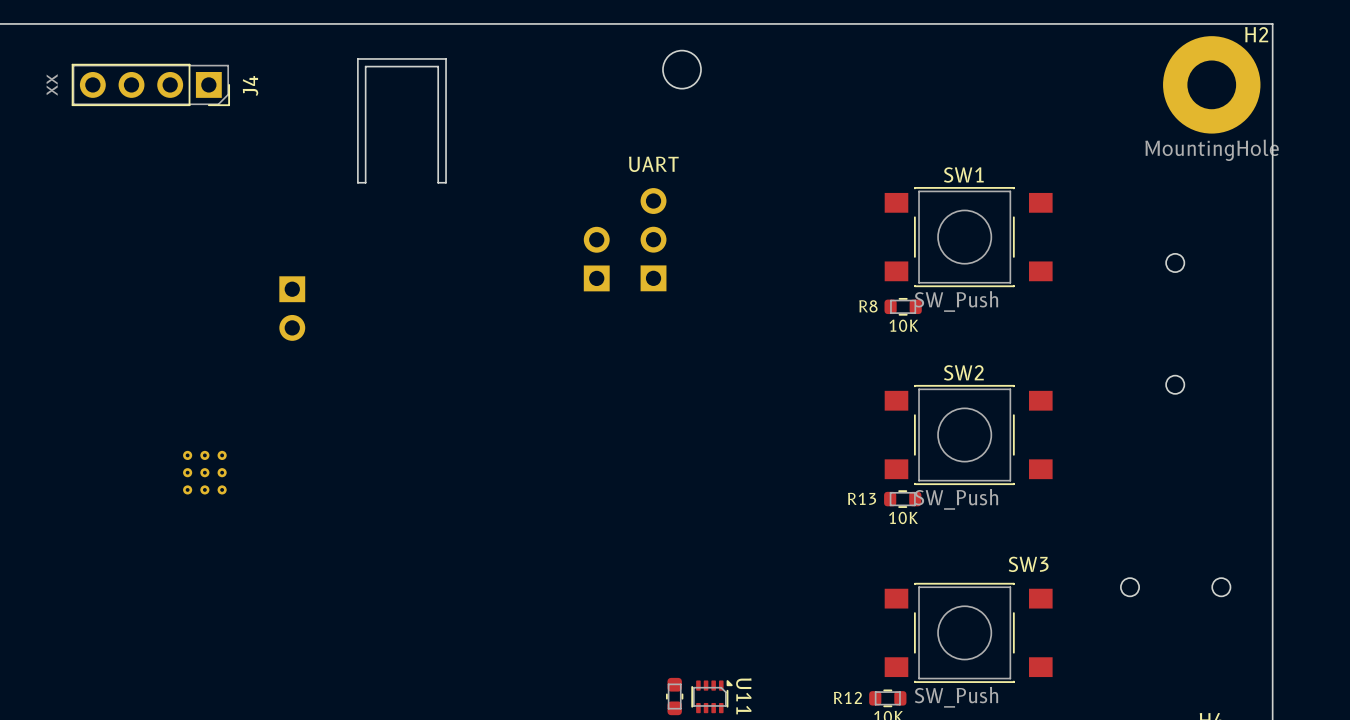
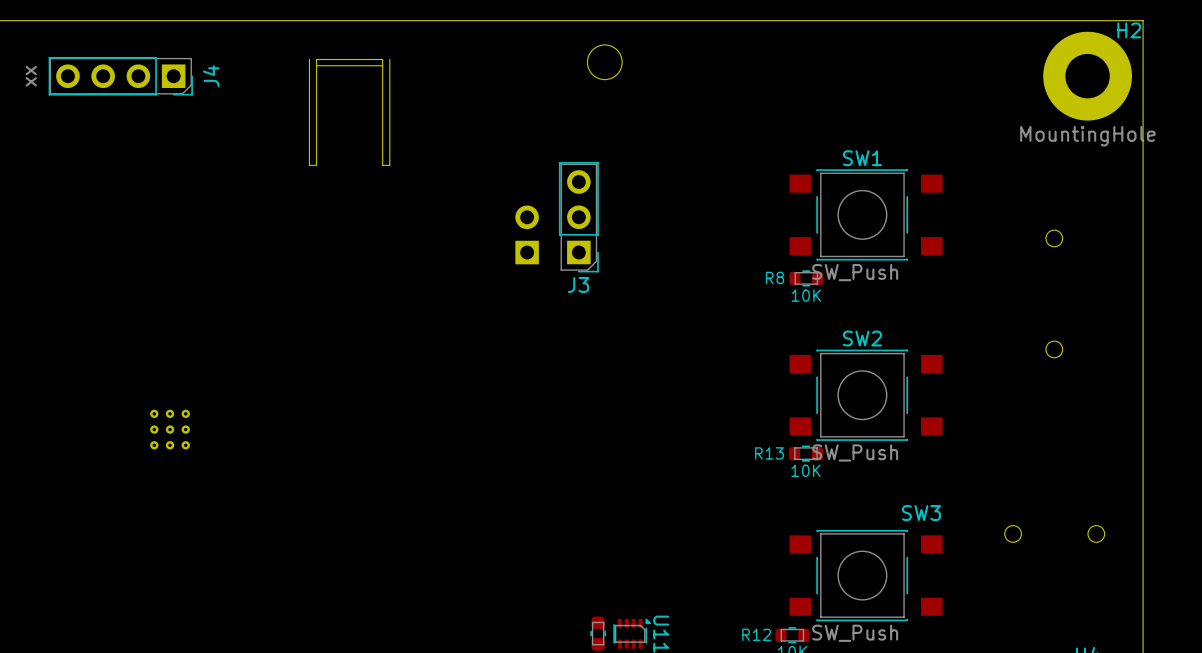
board edge: (357, 66) (357, 58) (446, 58) (446, 66) -> none
board edge: none -> (316, 65) (382, 65)
J3 side: bottom (653, 239) -> top (578, 217)
part: (292, 308) -> none

